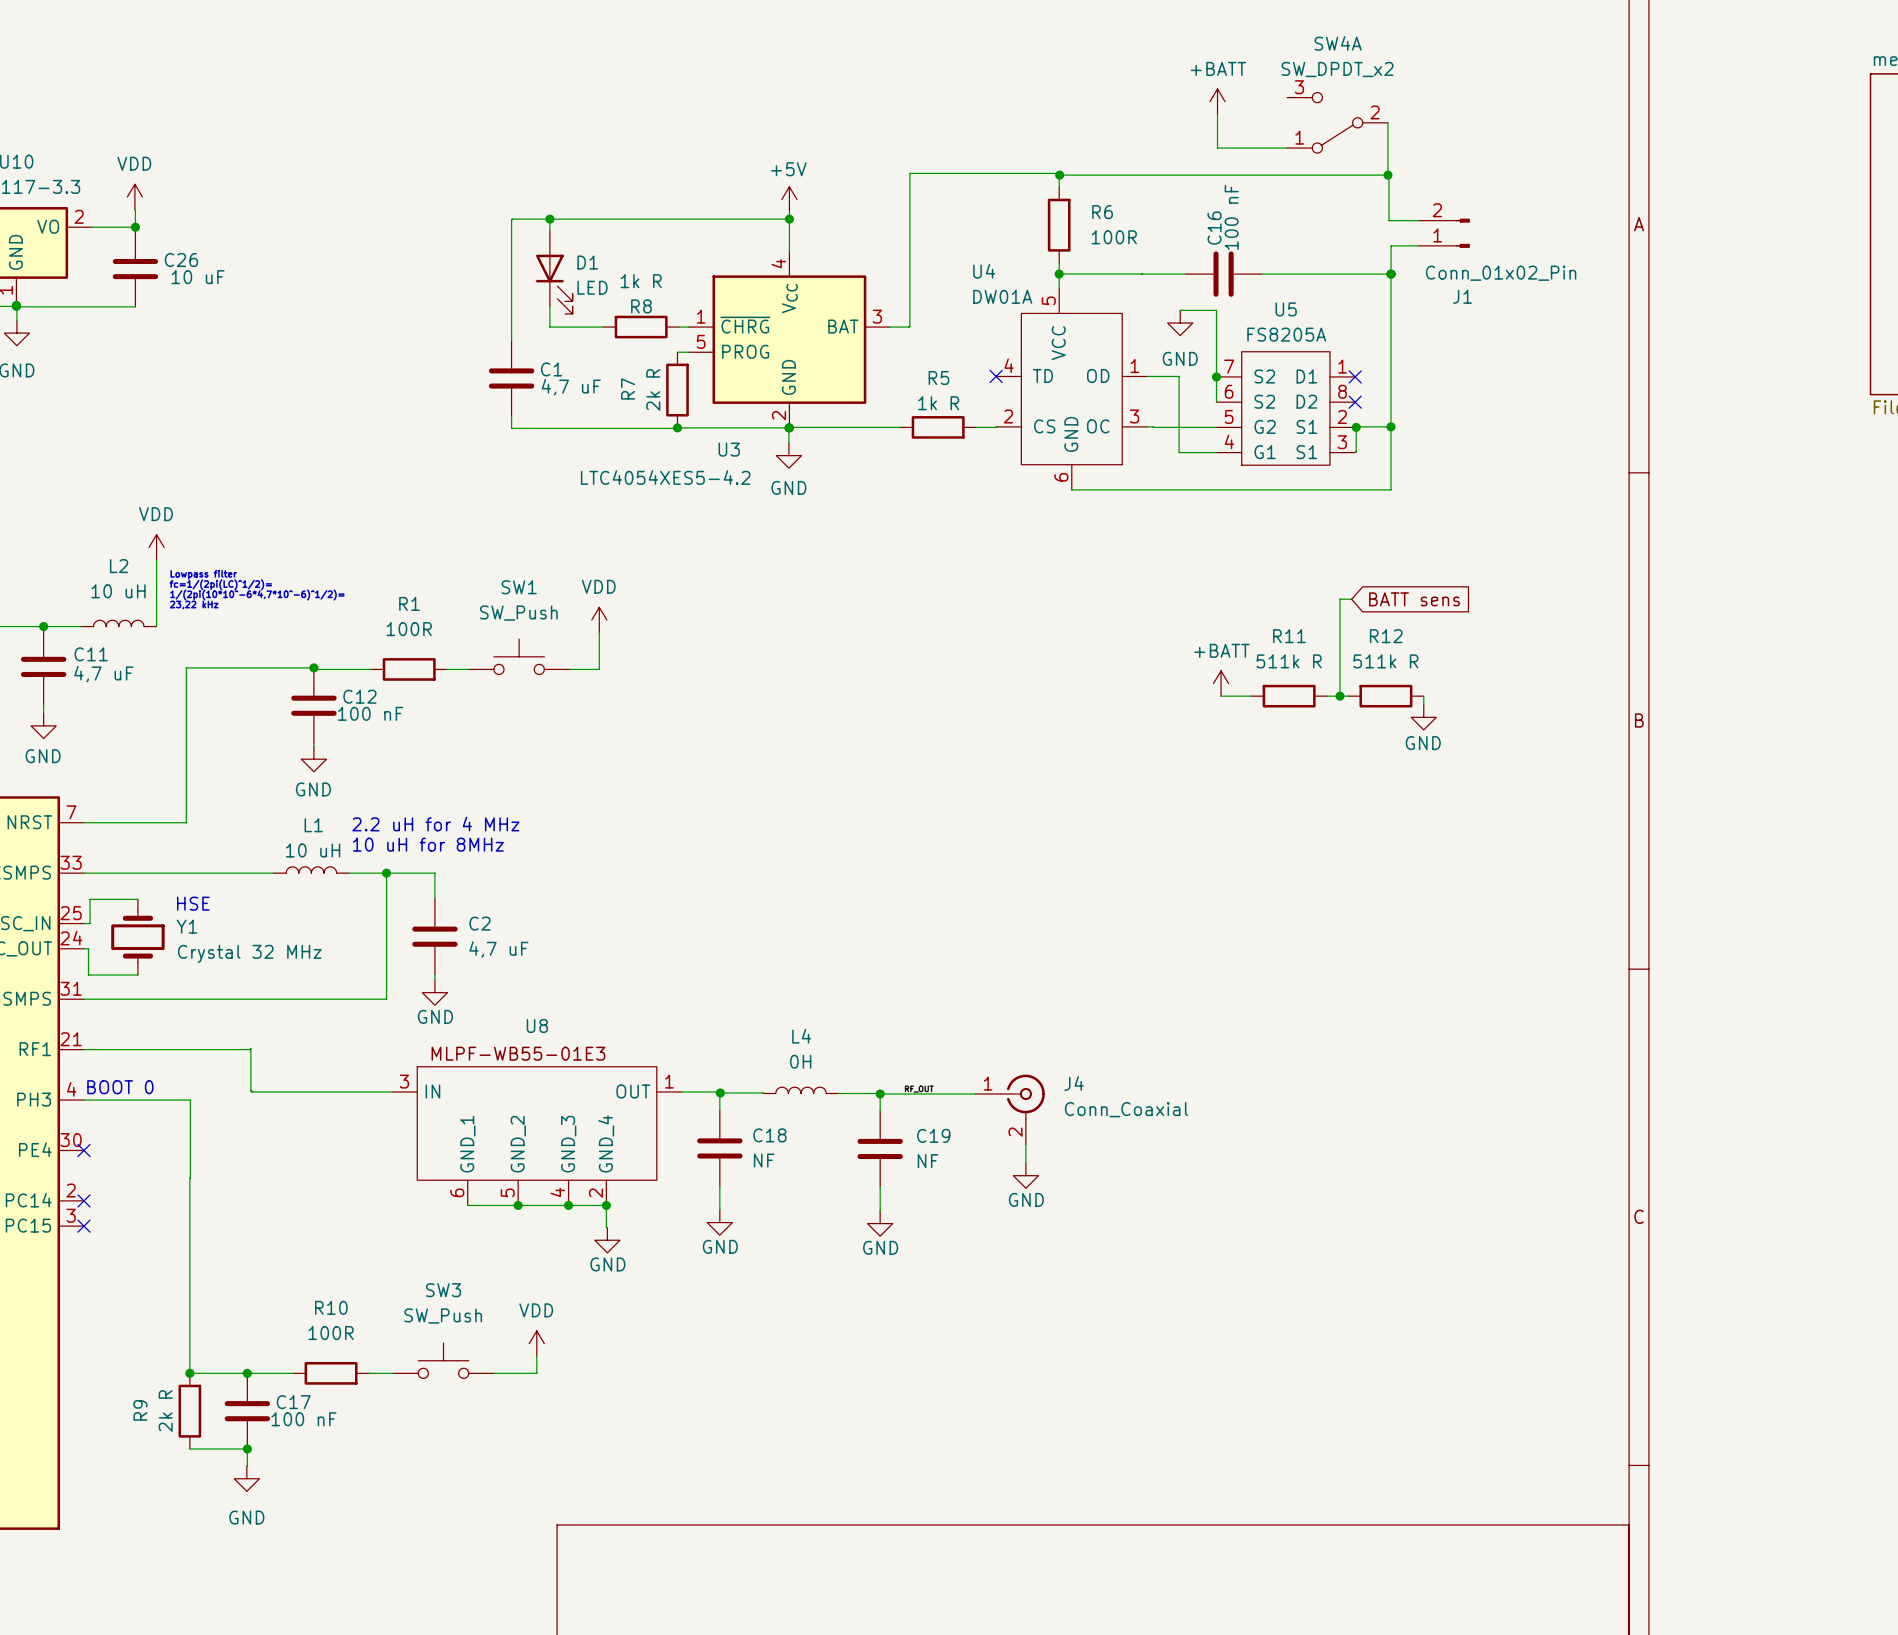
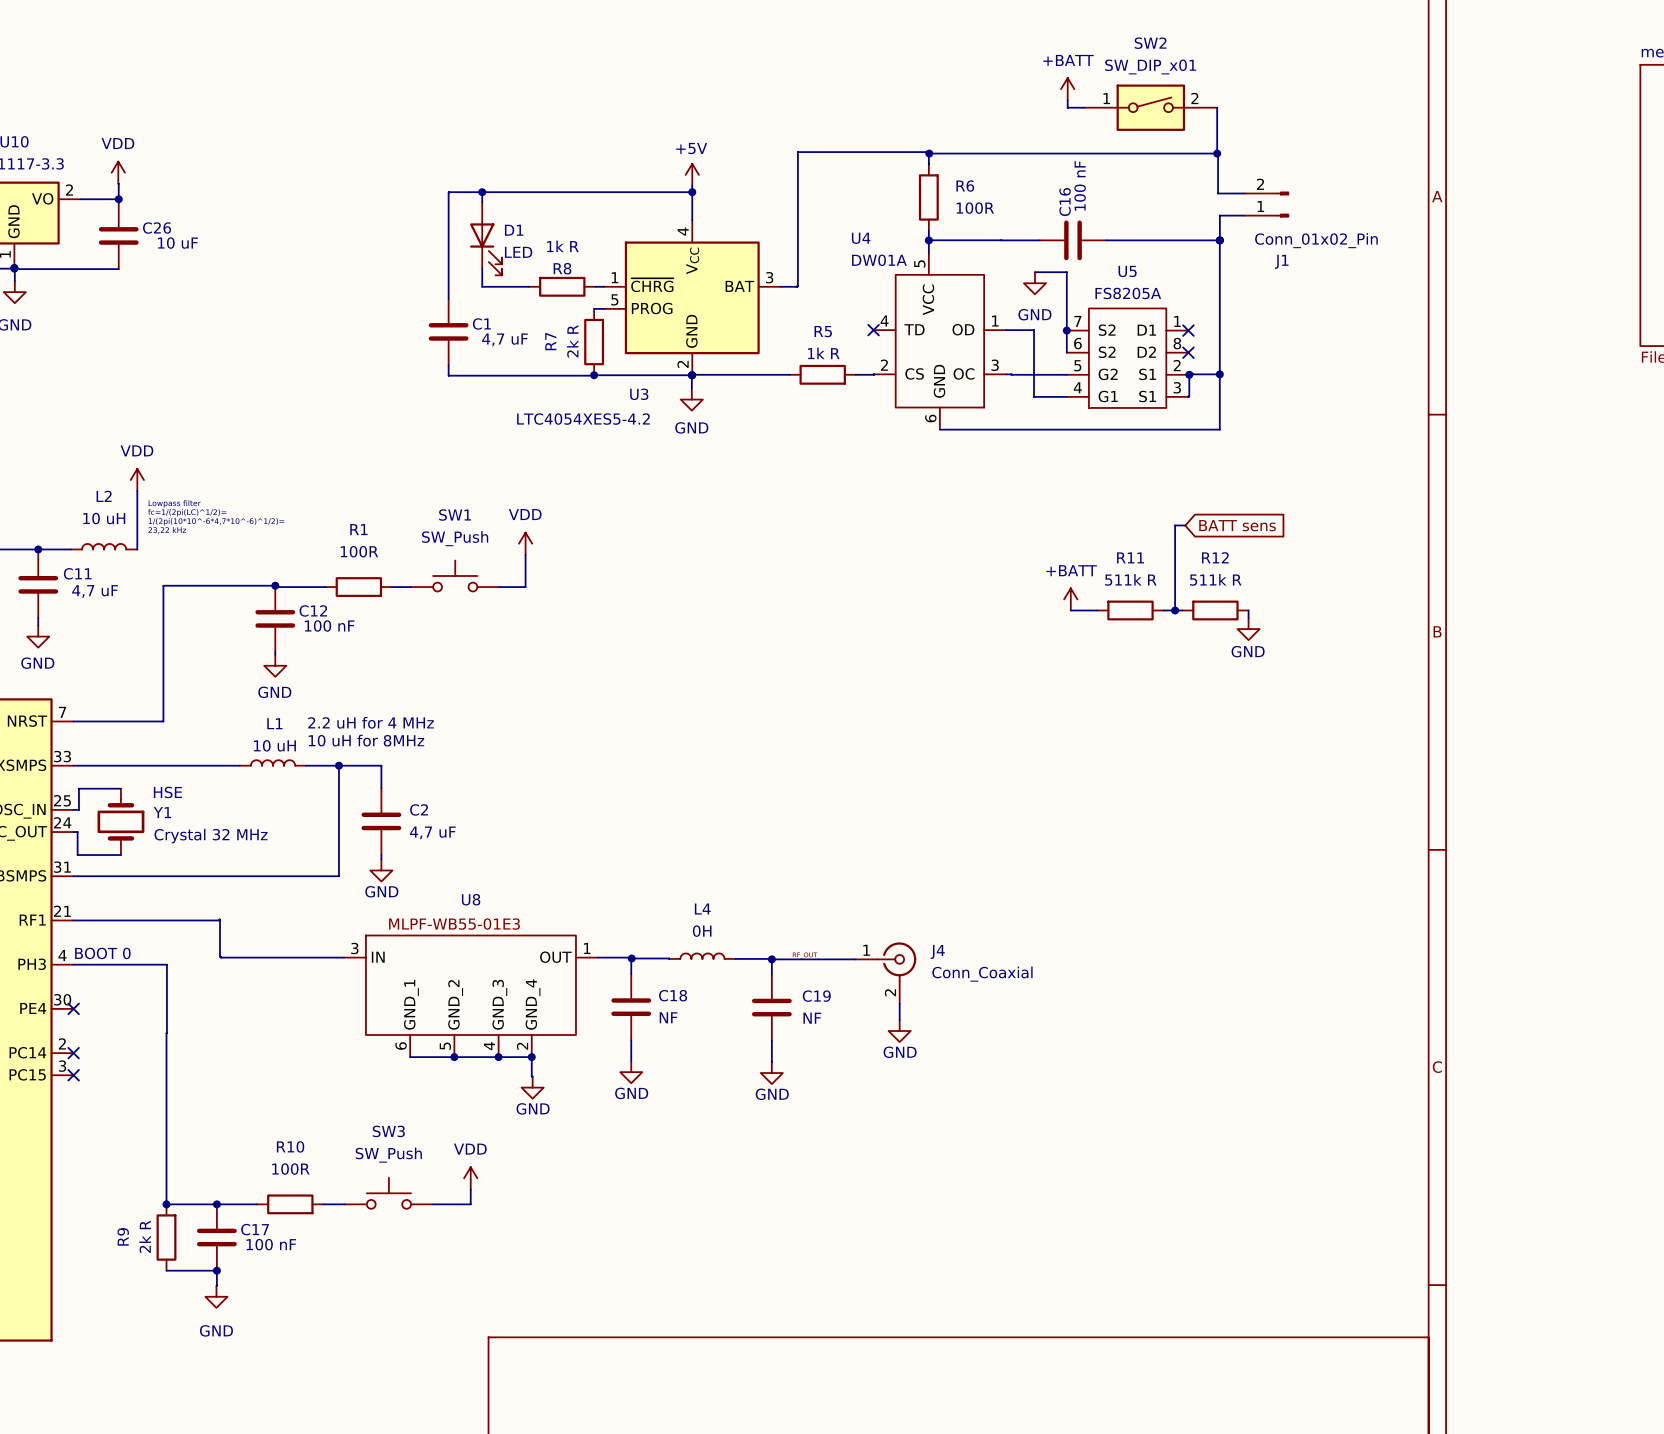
wire: (1217, 122) (1217, 148) (1287, 148) -> (1067, 107) (1084, 107)
SW2: none -> SW_DIP_x01 (1150, 107)
SW4A: SW_DPDT_x2 (1337, 122) -> none

